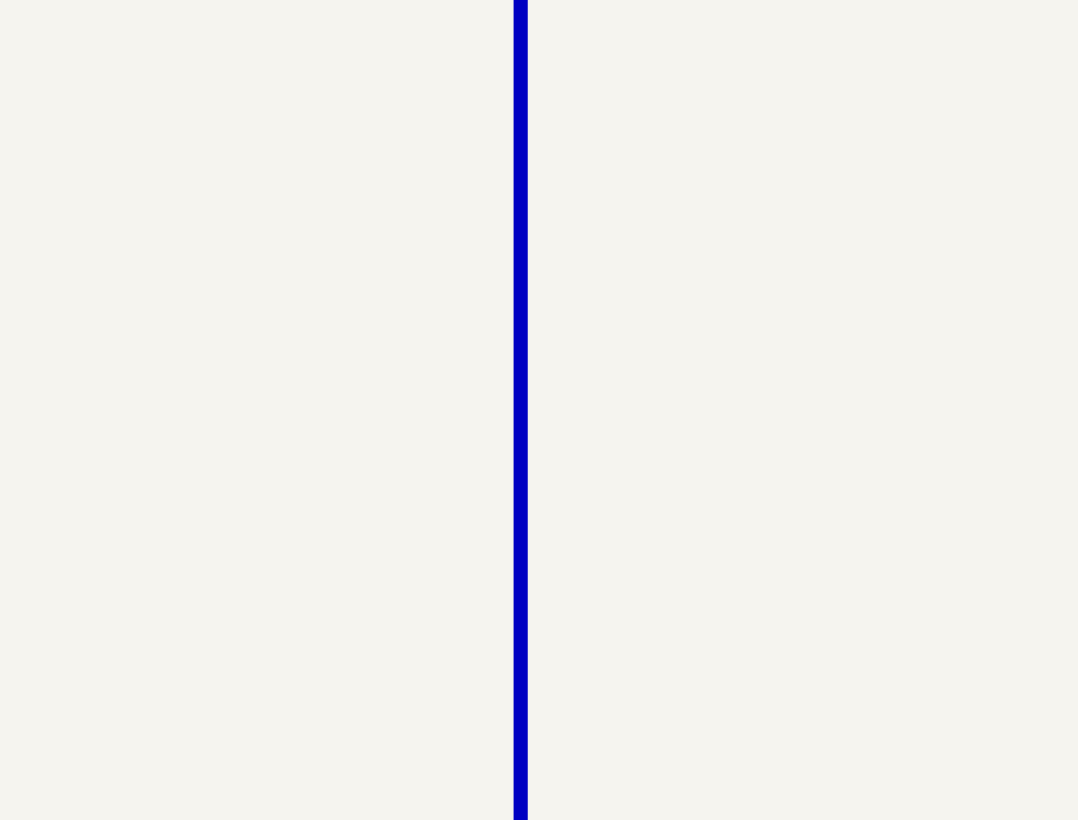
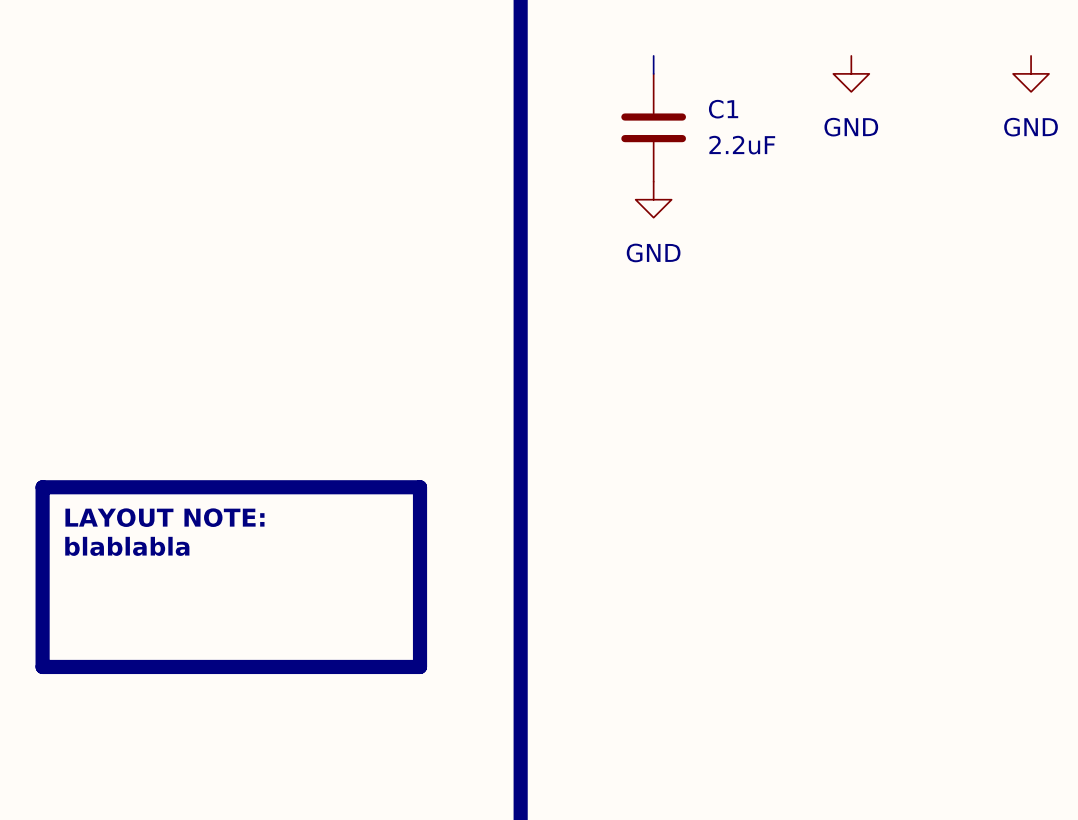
wire: none -> (653, 55) (653, 73)
power symbol: none -> GND (851, 73)
power symbol: none -> GND (1031, 73)
C1: none -> 2.2uF (653, 127)
power symbol: none -> GND (653, 199)
line: none -> (42, 487) (420, 487) (420, 666) (42, 666) (42, 487)
text: none -> LAYOUT NOTE: (164, 517)
text: none -> blablabla (127, 546)

